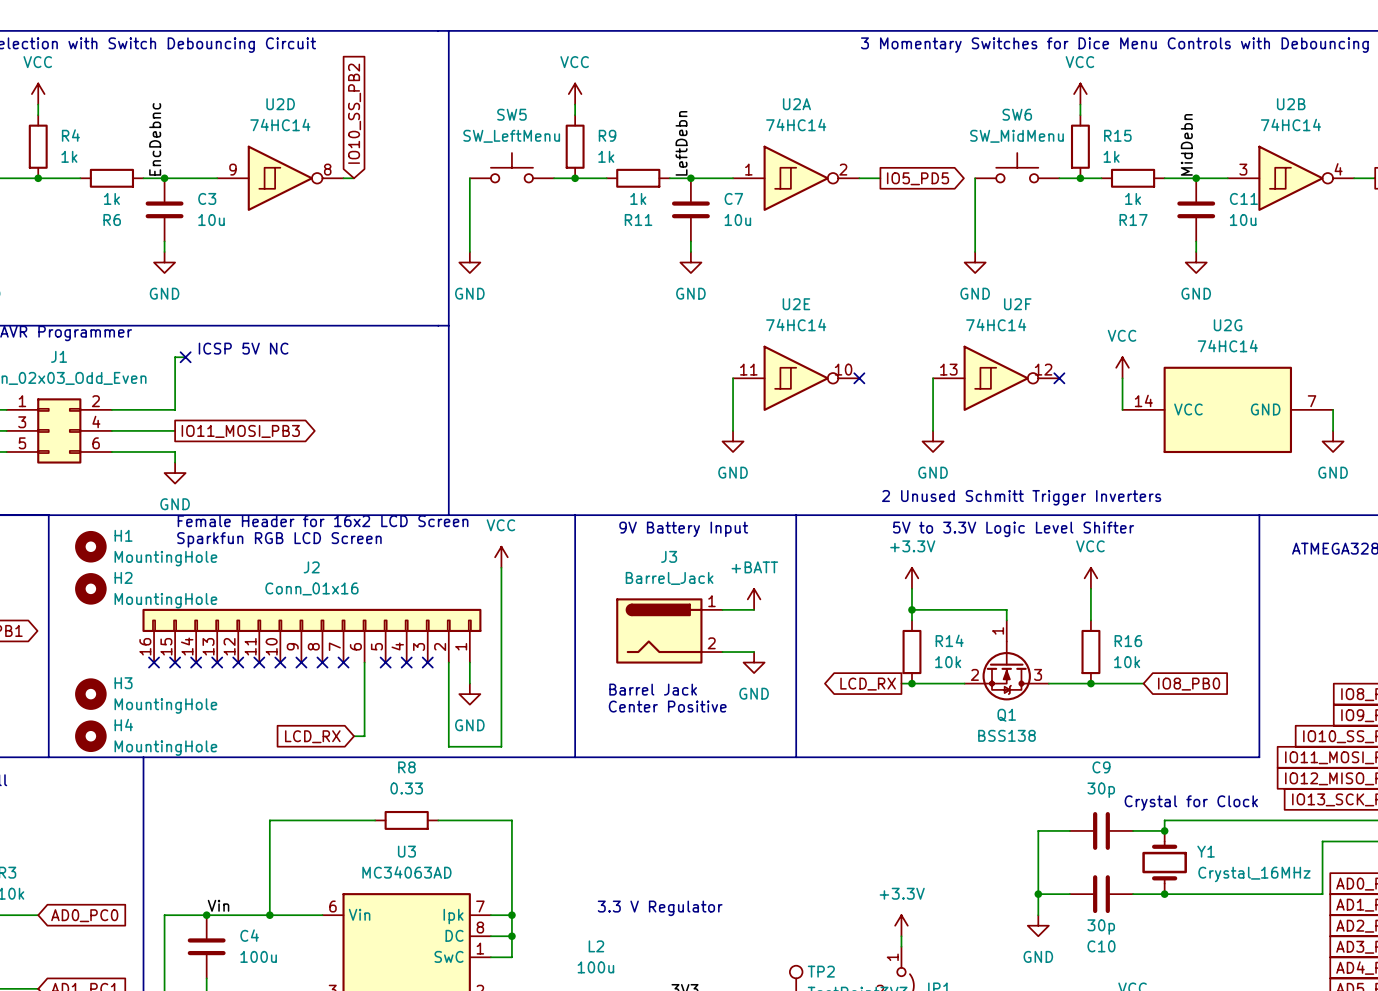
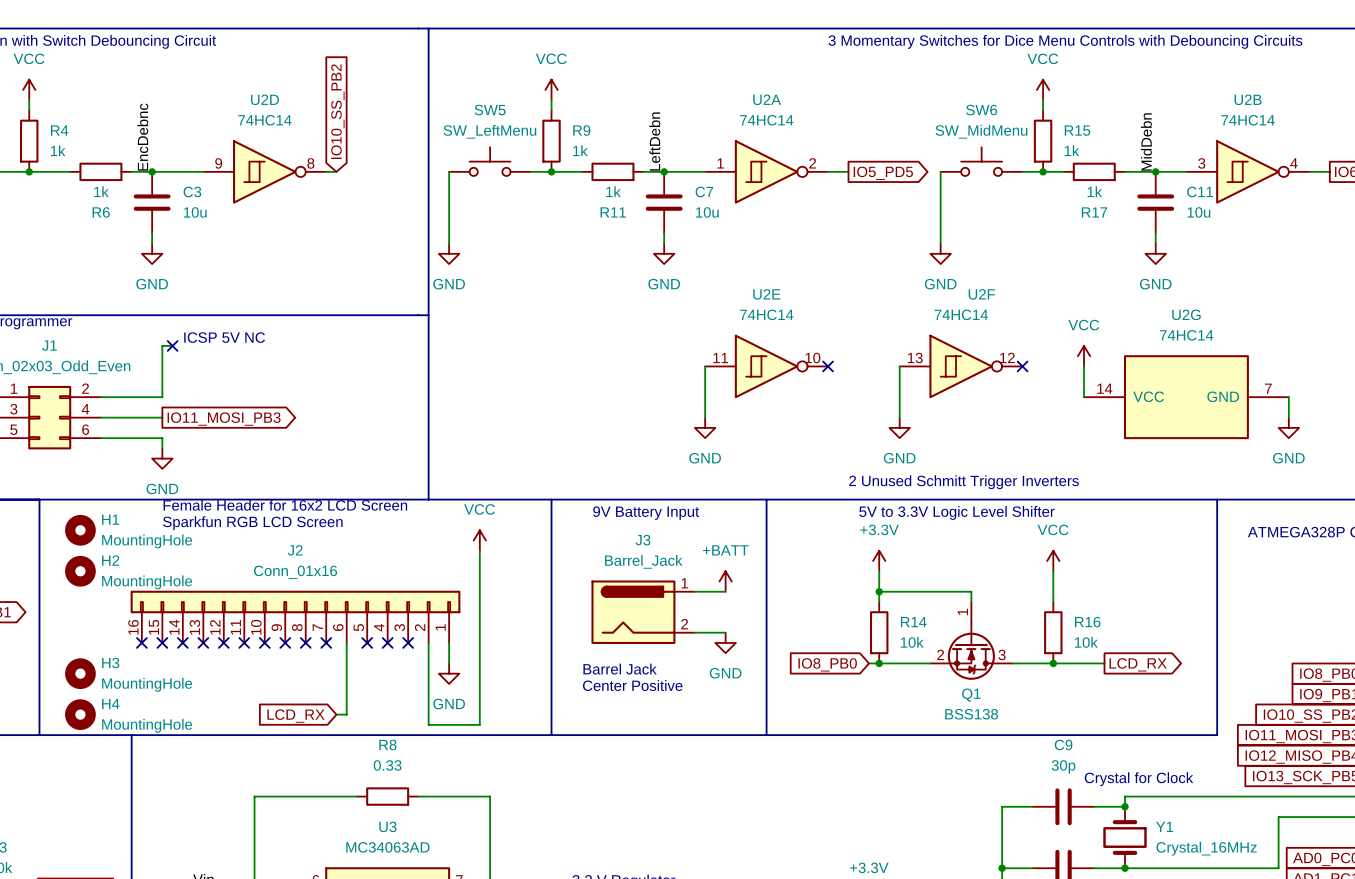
global label shape: output (868, 684) -> input (827, 664)
global label: LCD_RX (868, 684) -> IO8_PB0 (827, 664)
global label shape: input (1189, 684) -> output (1138, 664)
global label: IO8_PB0 (1189, 684) -> LCD_RX (1138, 664)

